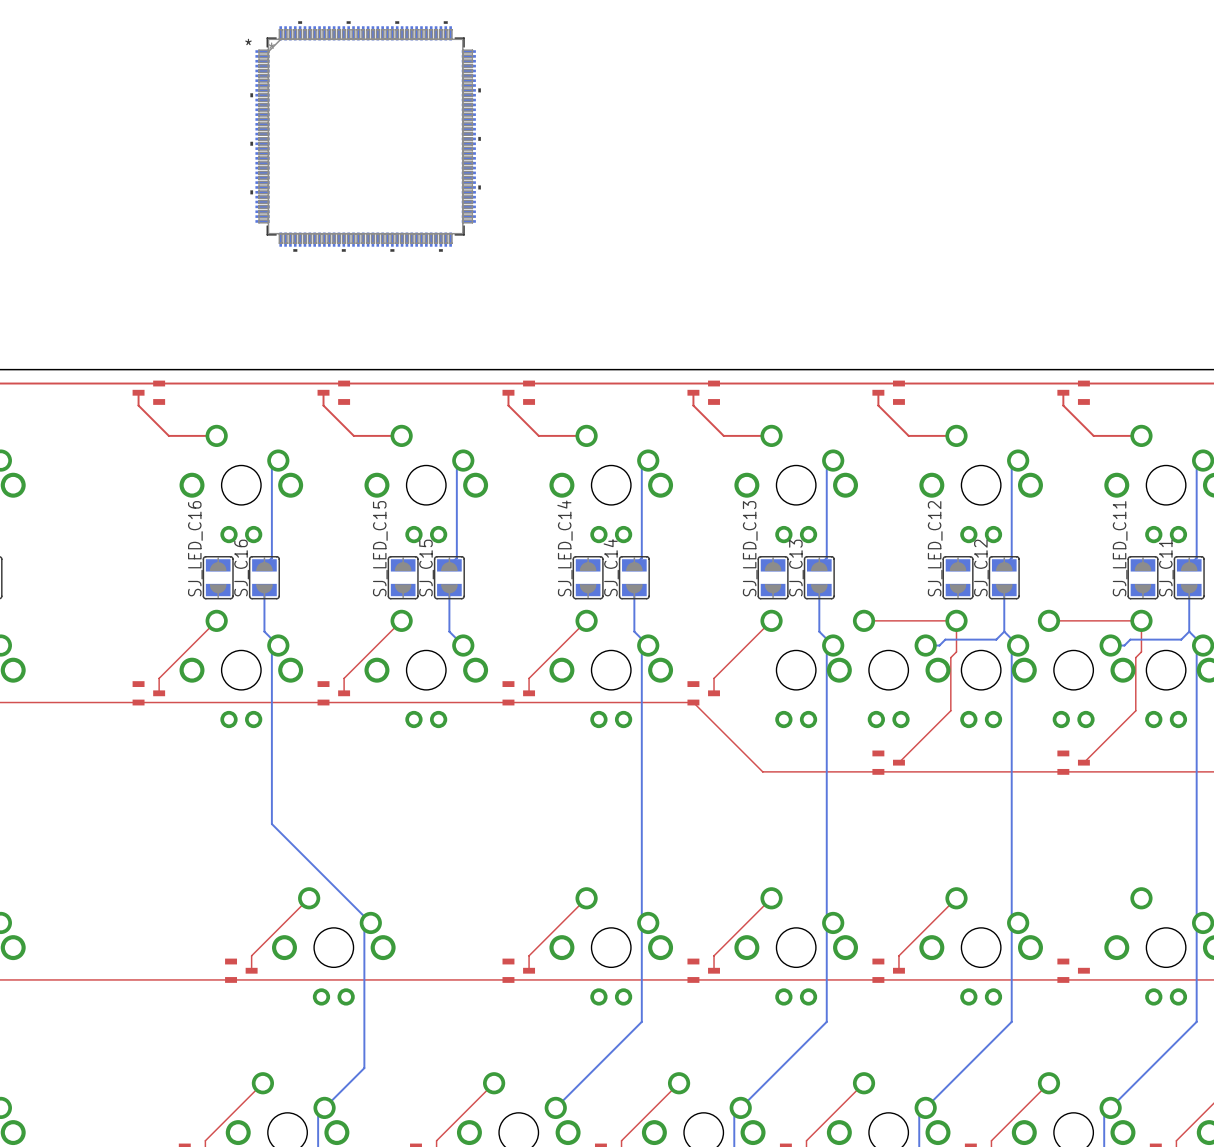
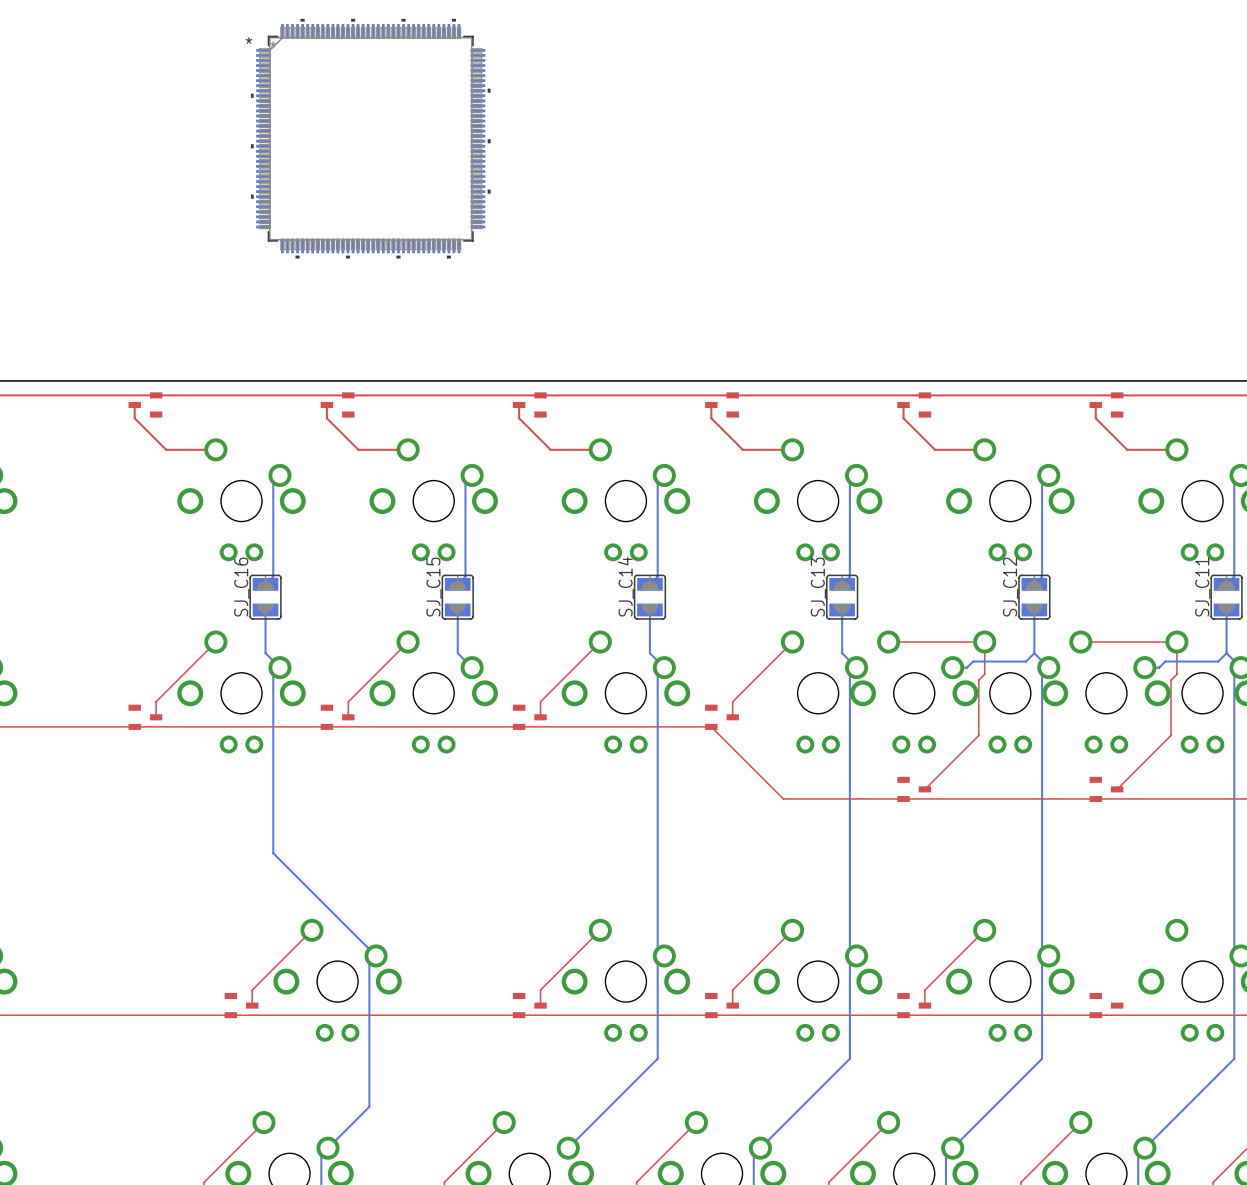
SJ_LED_C16: (218, 577) -> none
SJ_LED_C15: (403, 577) -> none
SJ_LED_C14: (588, 577) -> none
SJ_LED_C13: (773, 577) -> none
SJ_LED_C12: (958, 577) -> none
SJ_LED_C11: (1142, 577) -> none

